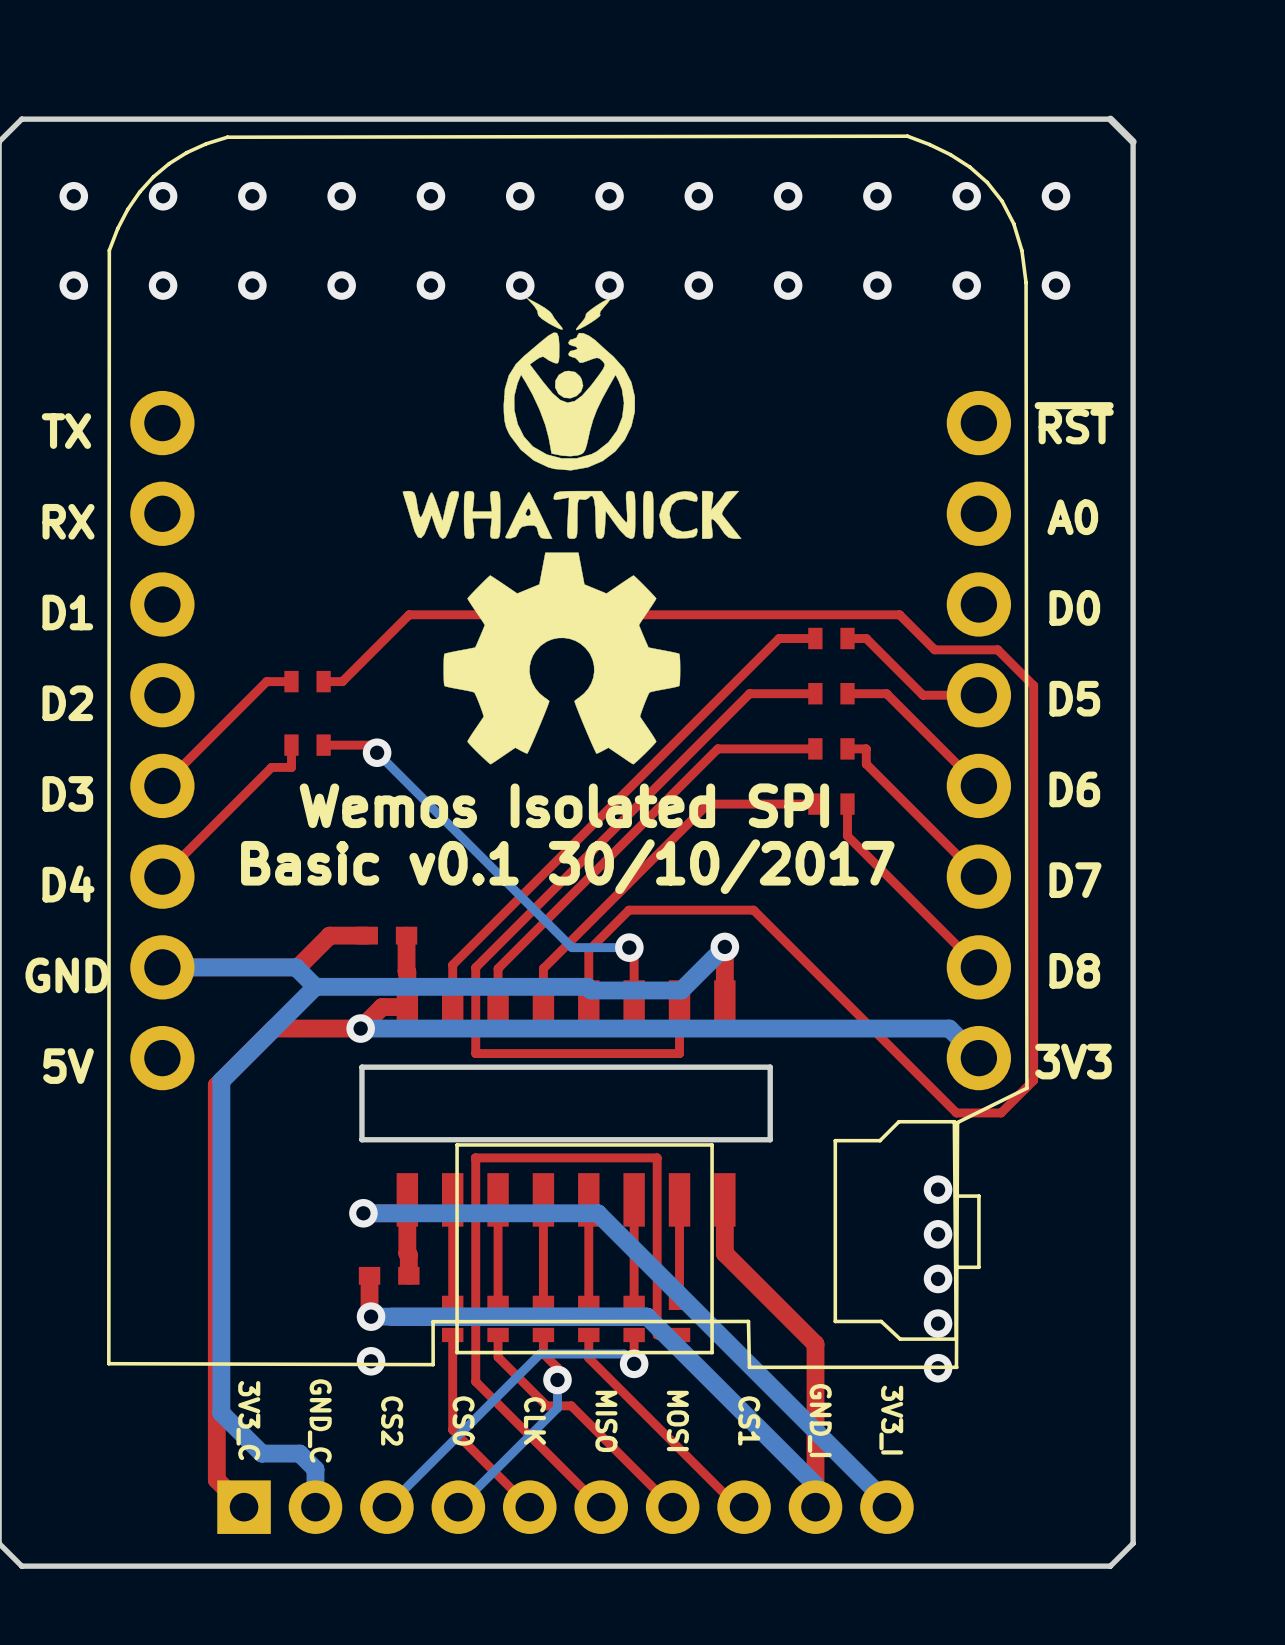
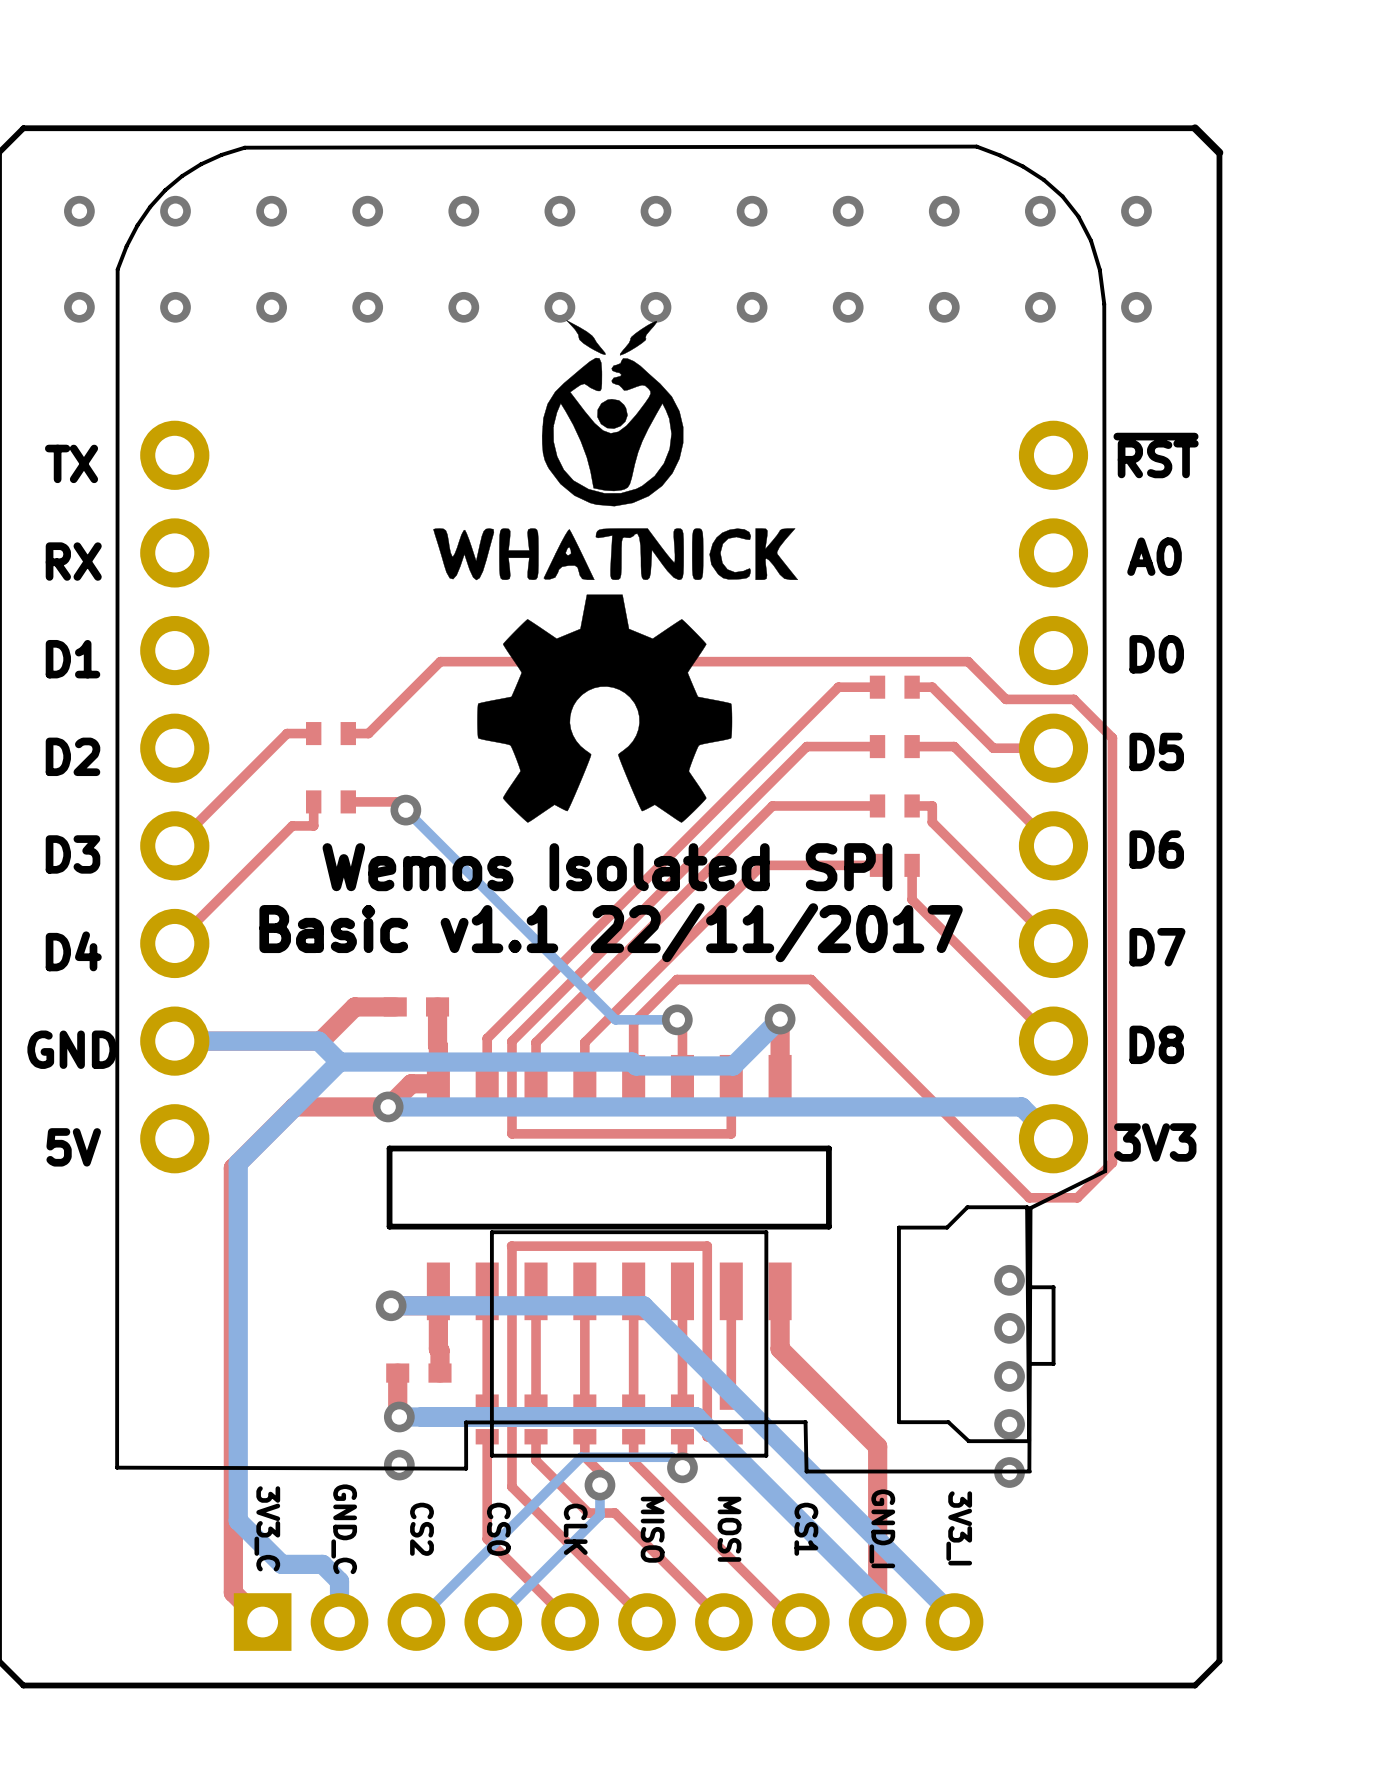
text: Basic v0.1 30/10/2017 (567, 866) -> Basic v1.1 22/11/2017 (611, 932)

